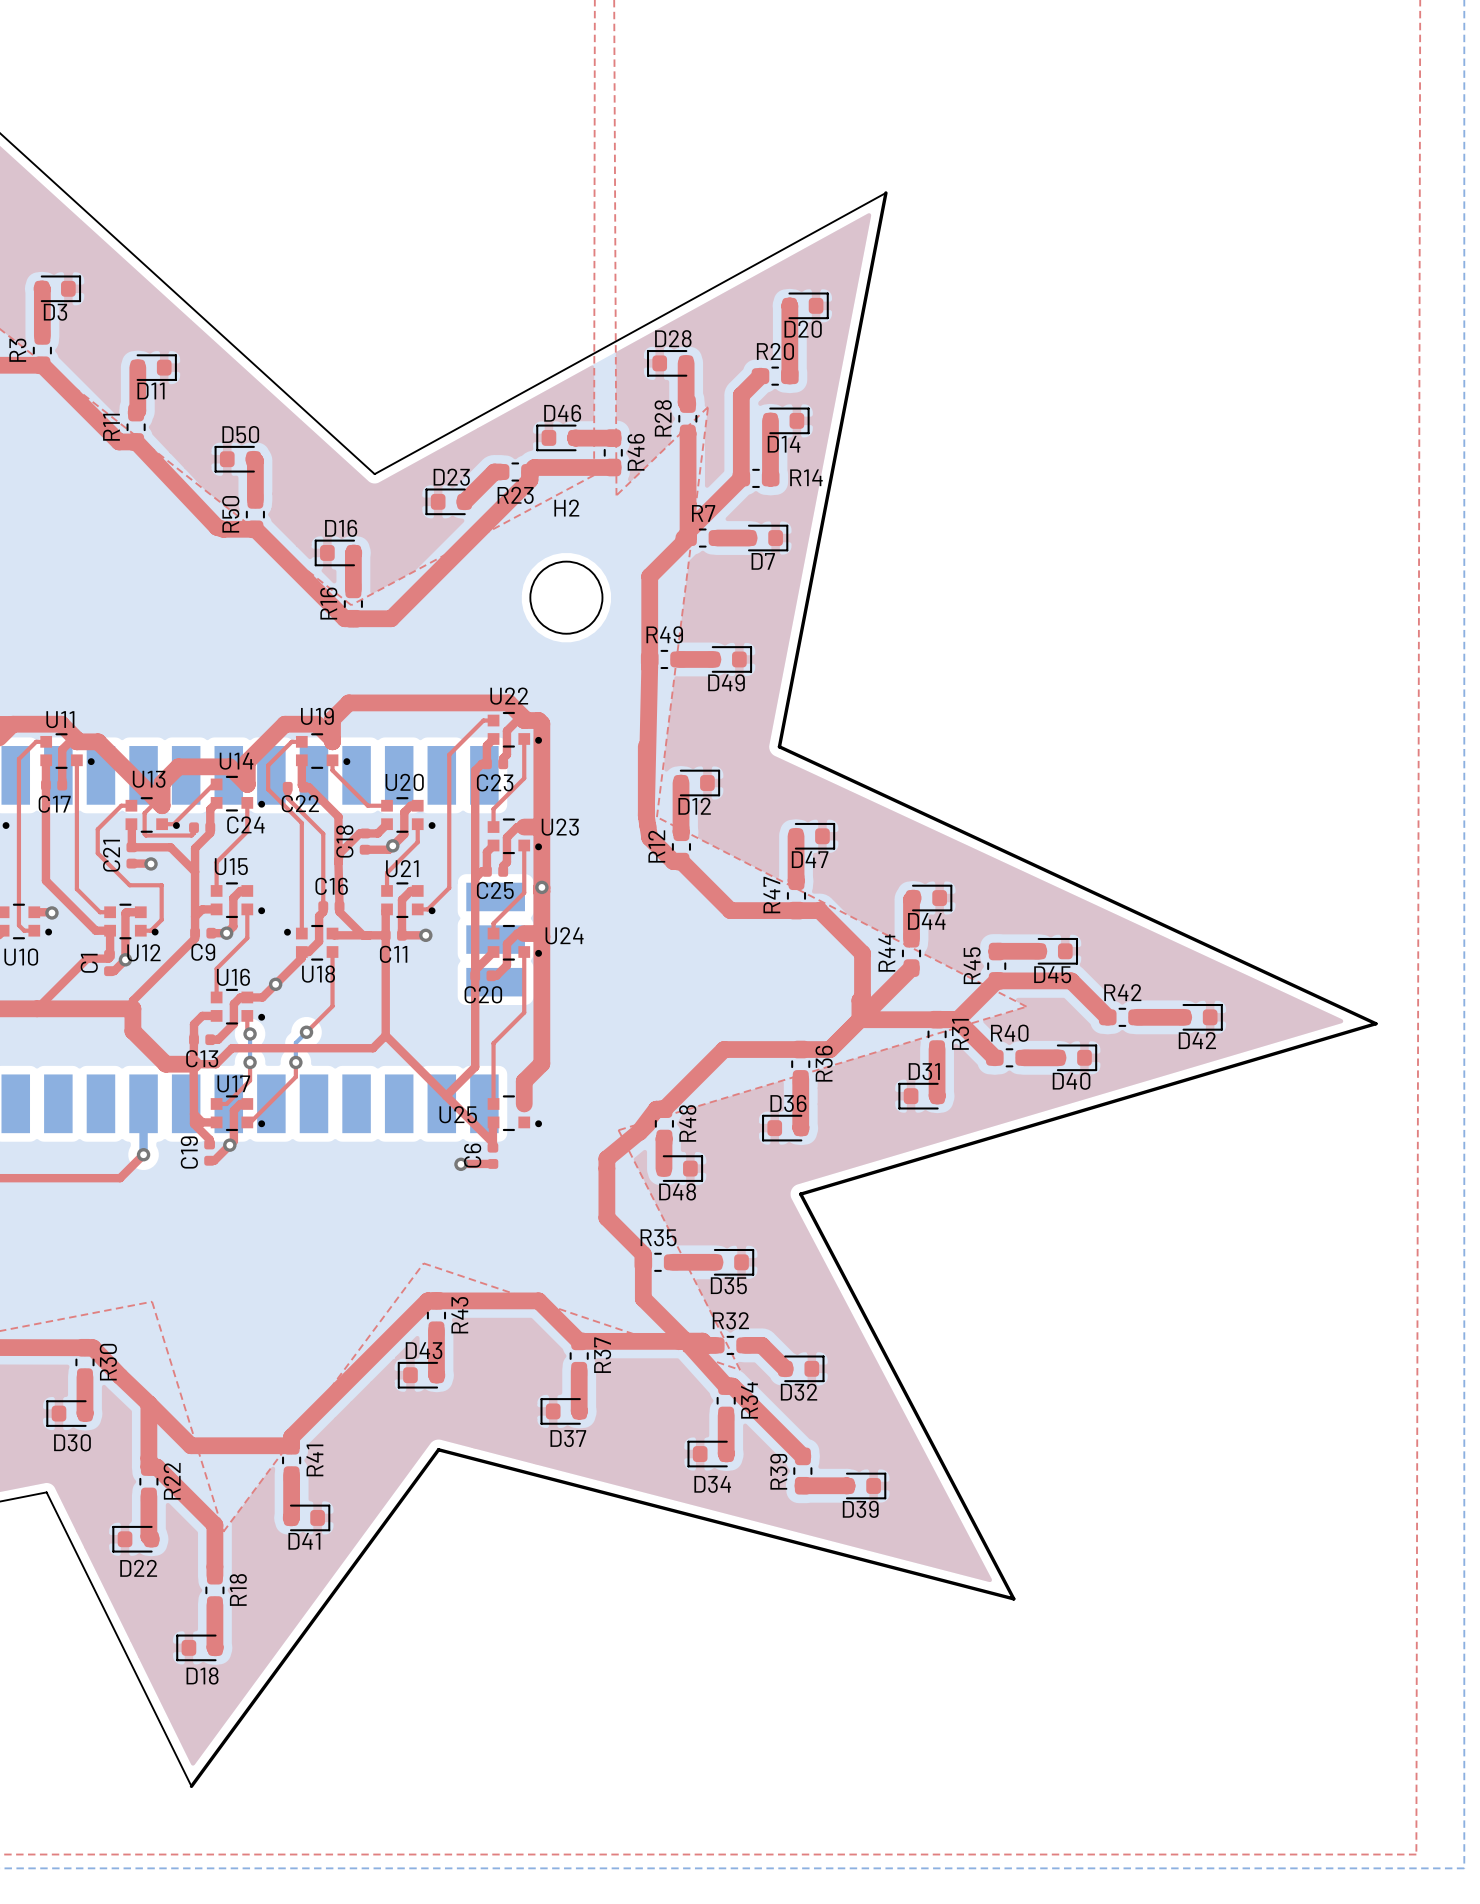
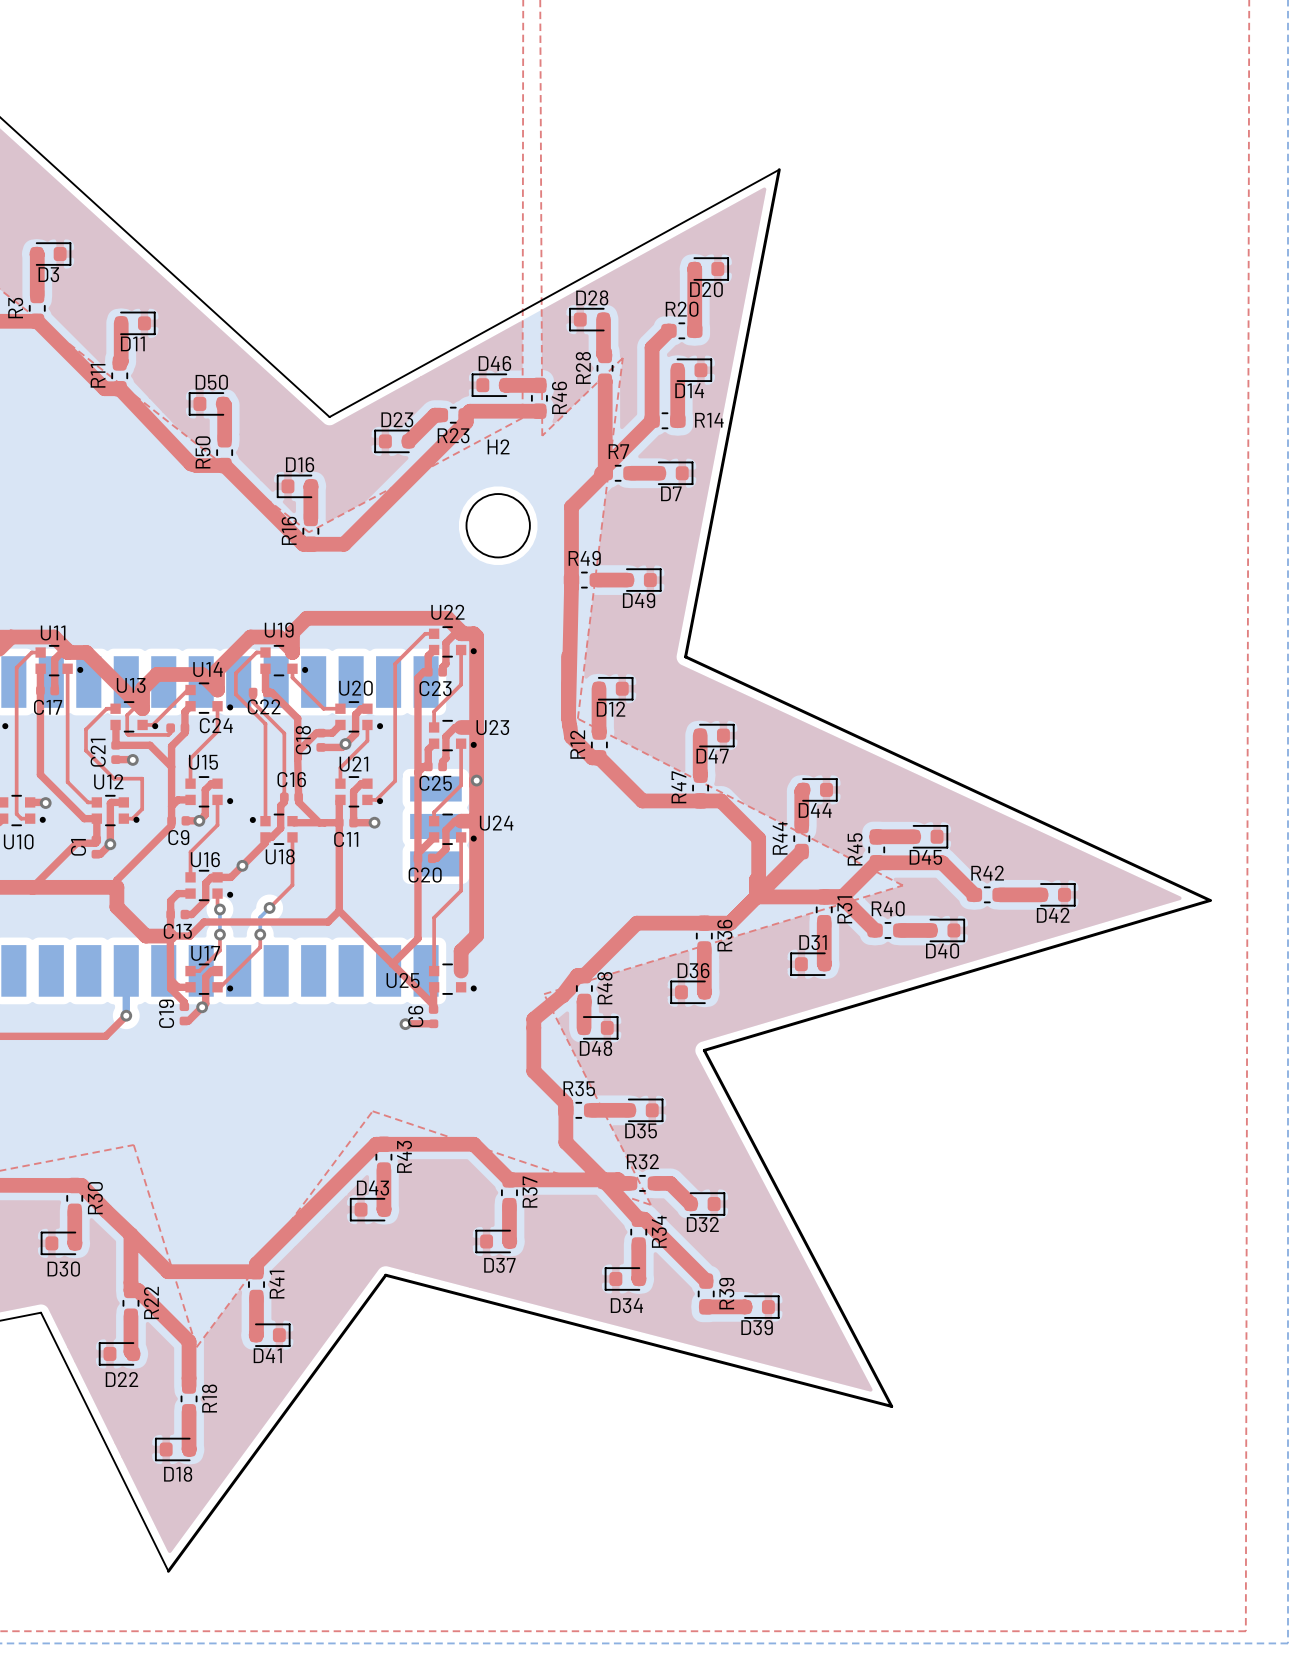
U12 name position: U12 (143, 952) -> U12 (108, 781)
R39 name position: R39 (778, 1471) -> R39 (726, 1293)

